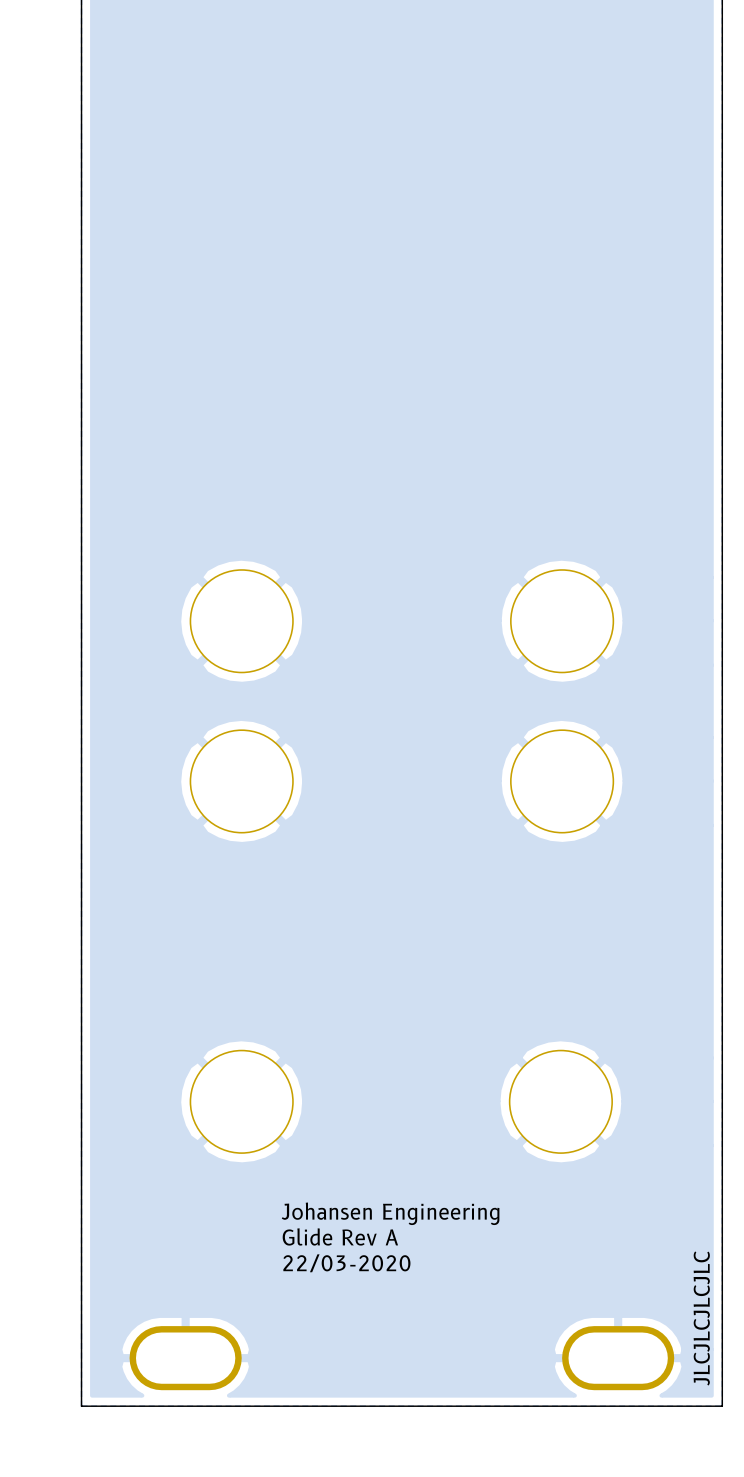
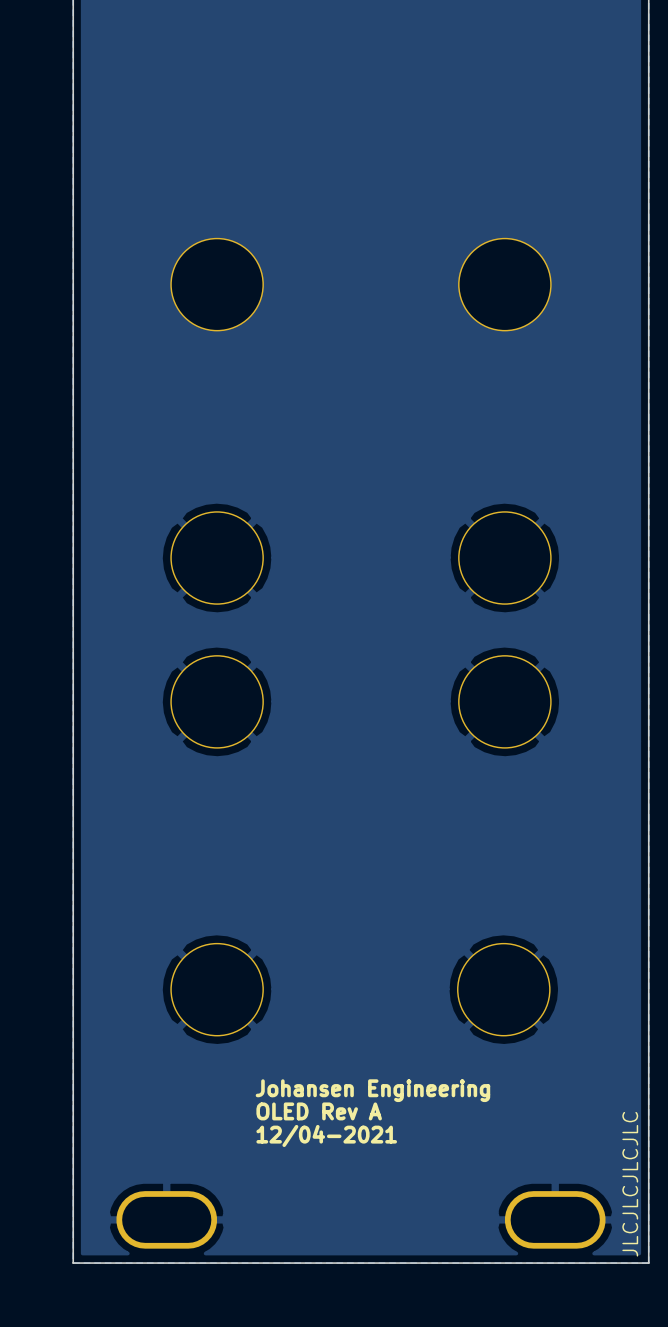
part: none -> (217, 284)
part: none -> (504, 284)
text: Glide Rev A (340, 1236) -> OLED Rev A (319, 1111)
text: 22/03-2020 (346, 1263) -> 12/04-2021 (326, 1135)

